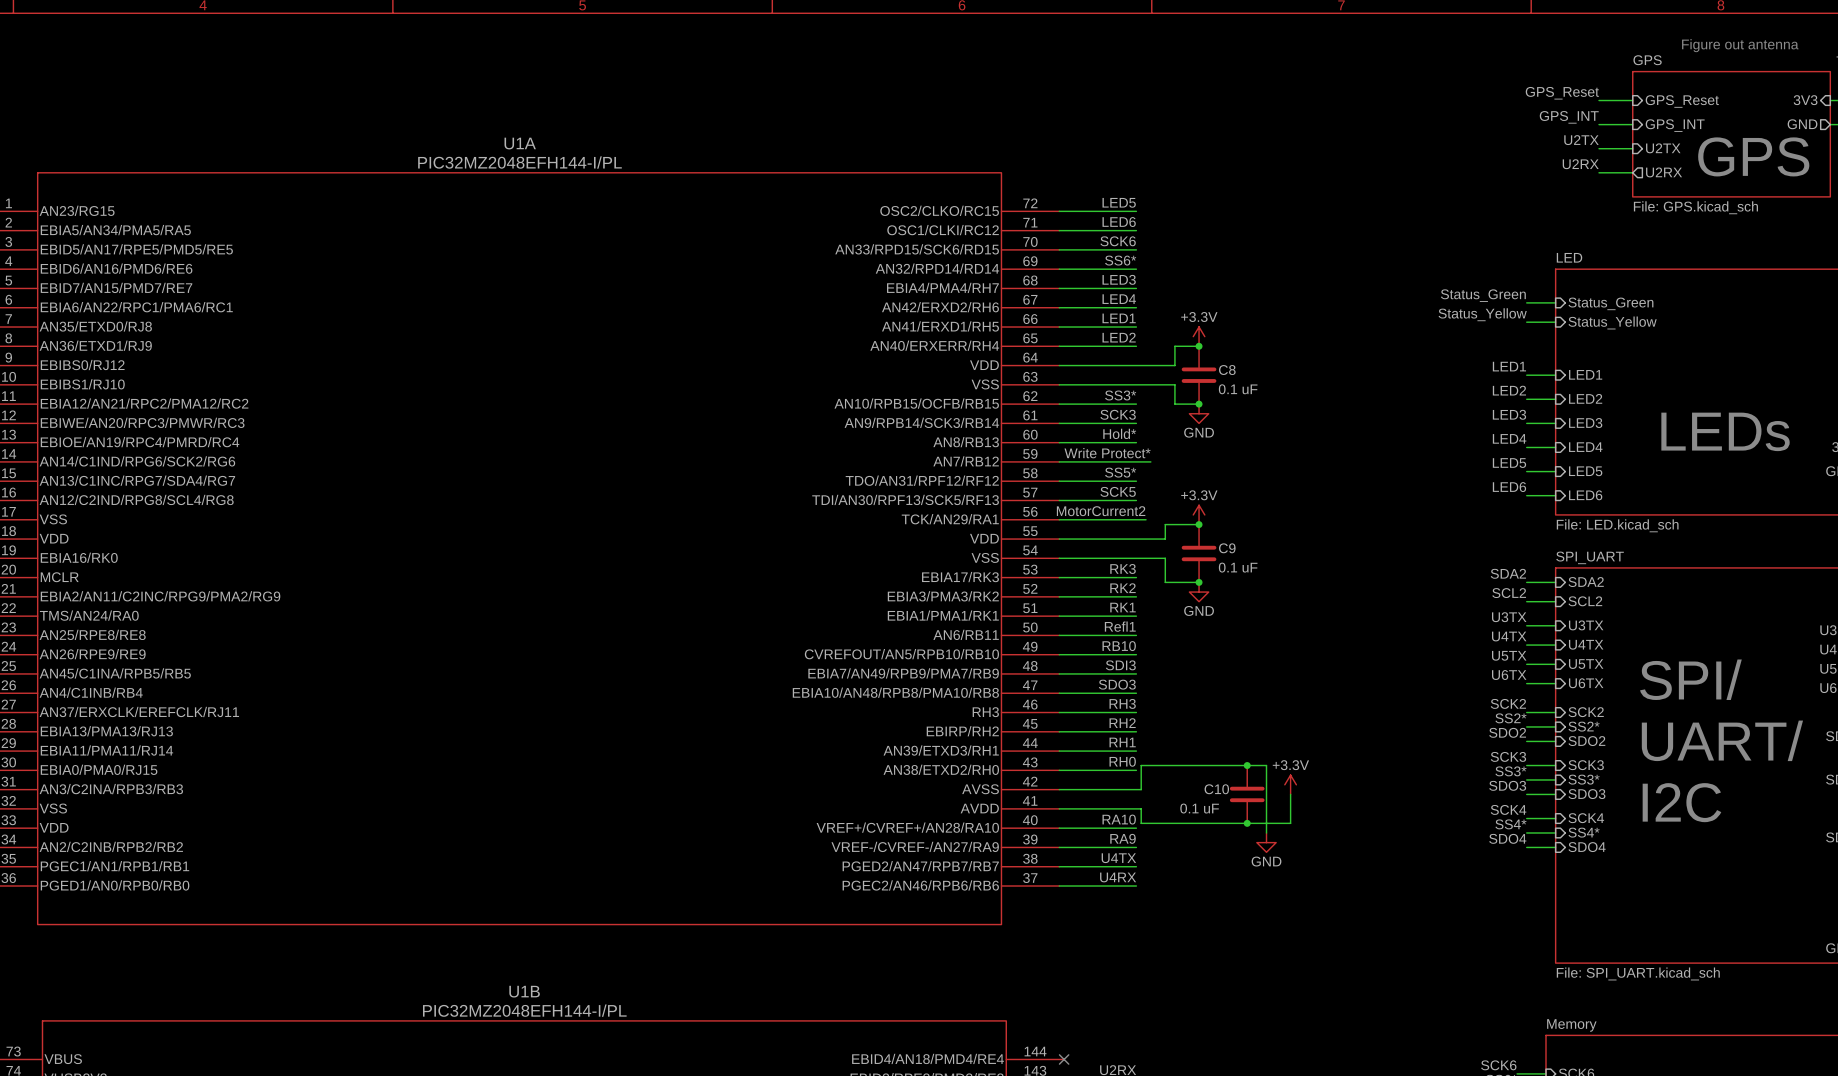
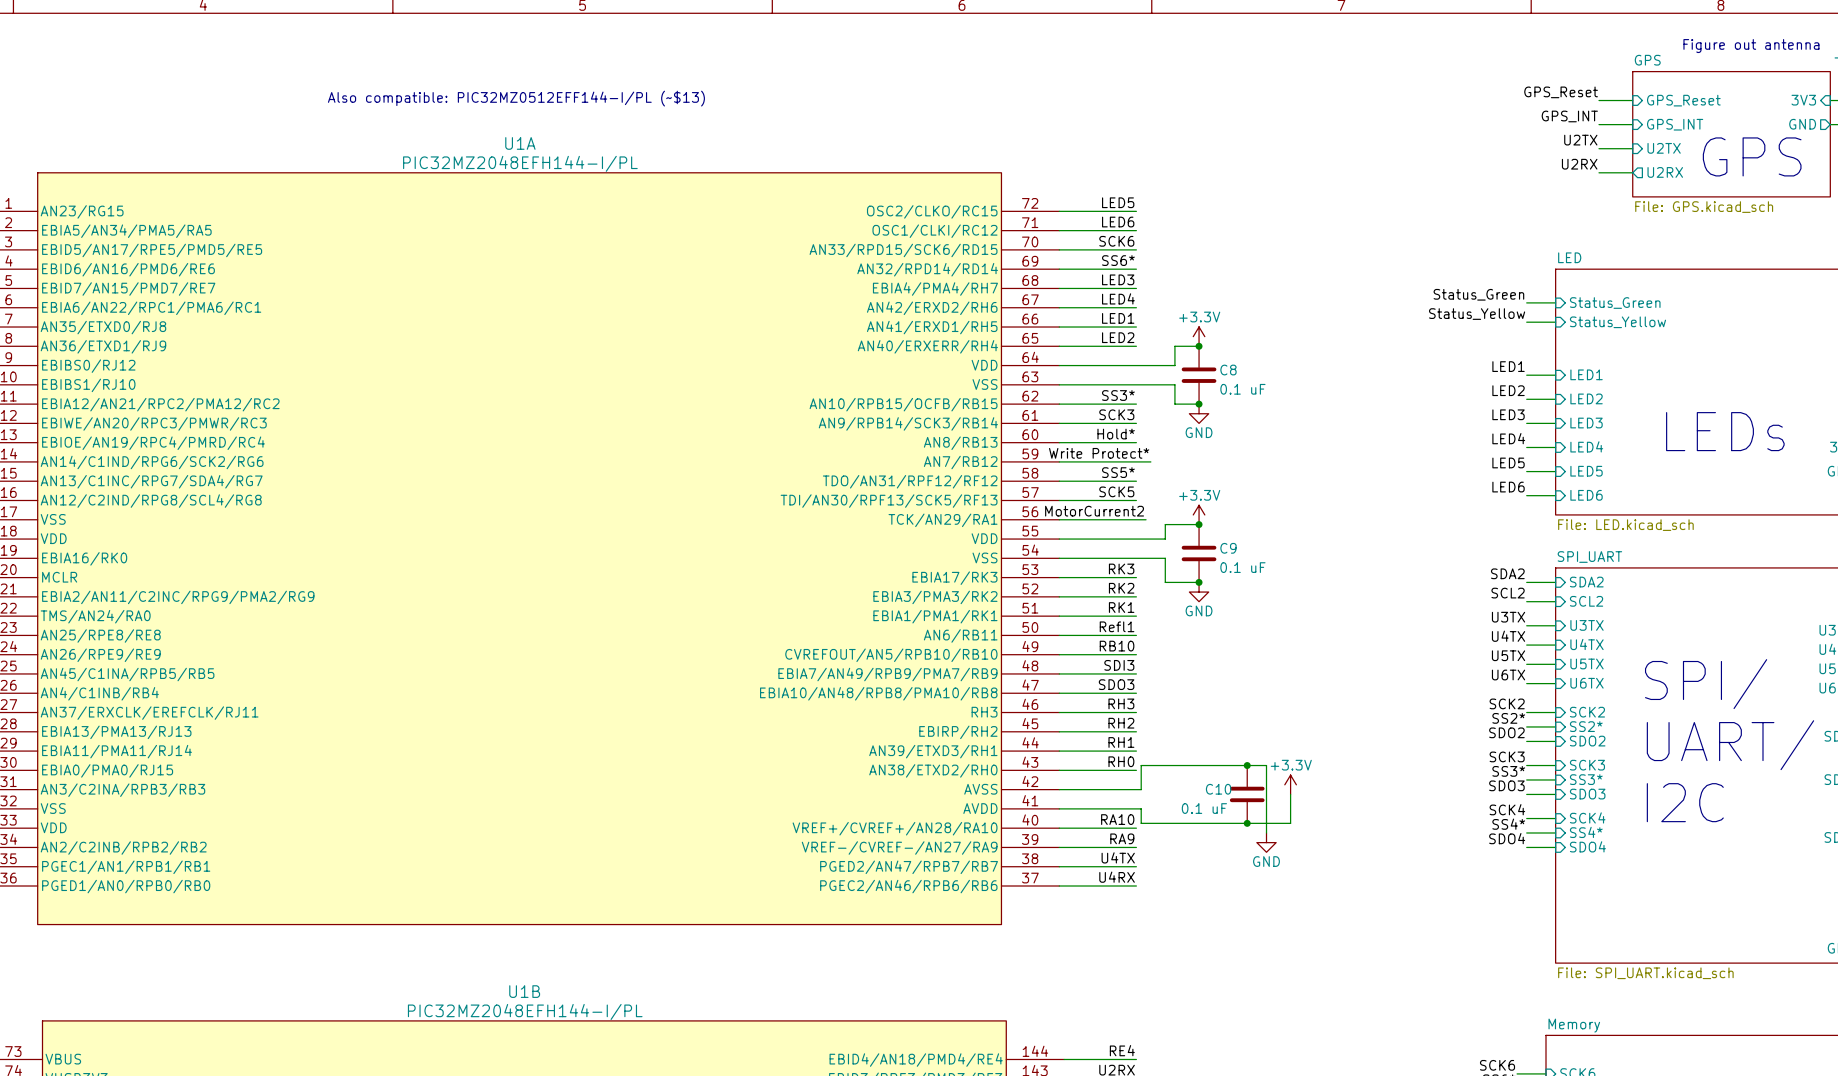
text: none -> Also compatible: PIC32MZ0512EFF144-I/PL (~$13) (516, 98)
label: none -> RE4 (1122, 1050)
wire: none -> (1064, 1059) (1136, 1059)
no-connect mark: (1064, 1059) -> none

